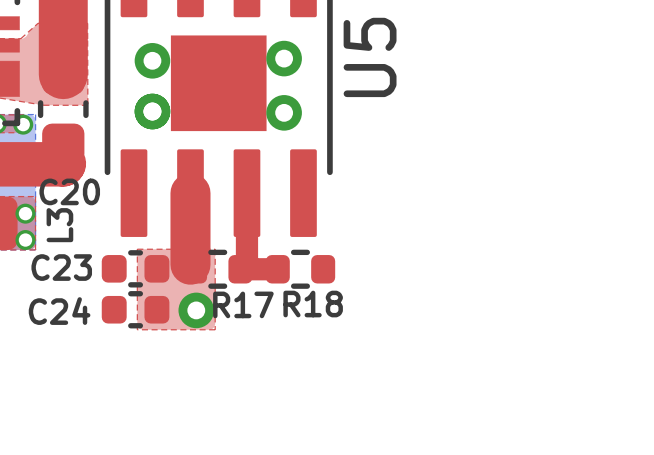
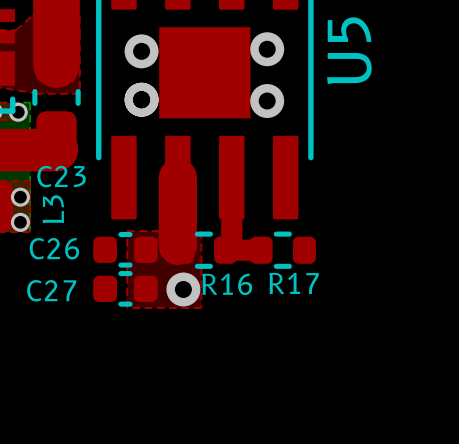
C20 name: C20 (69, 191) -> C23 (61, 176)
C23 name: C23 (61, 267) -> C26 (54, 248)
R17 name: R17 (243, 304) -> R16 (227, 284)
R18 name: R18 (313, 304) -> R17 (294, 283)
C24 name: C24 (59, 311) -> C27 (51, 290)

